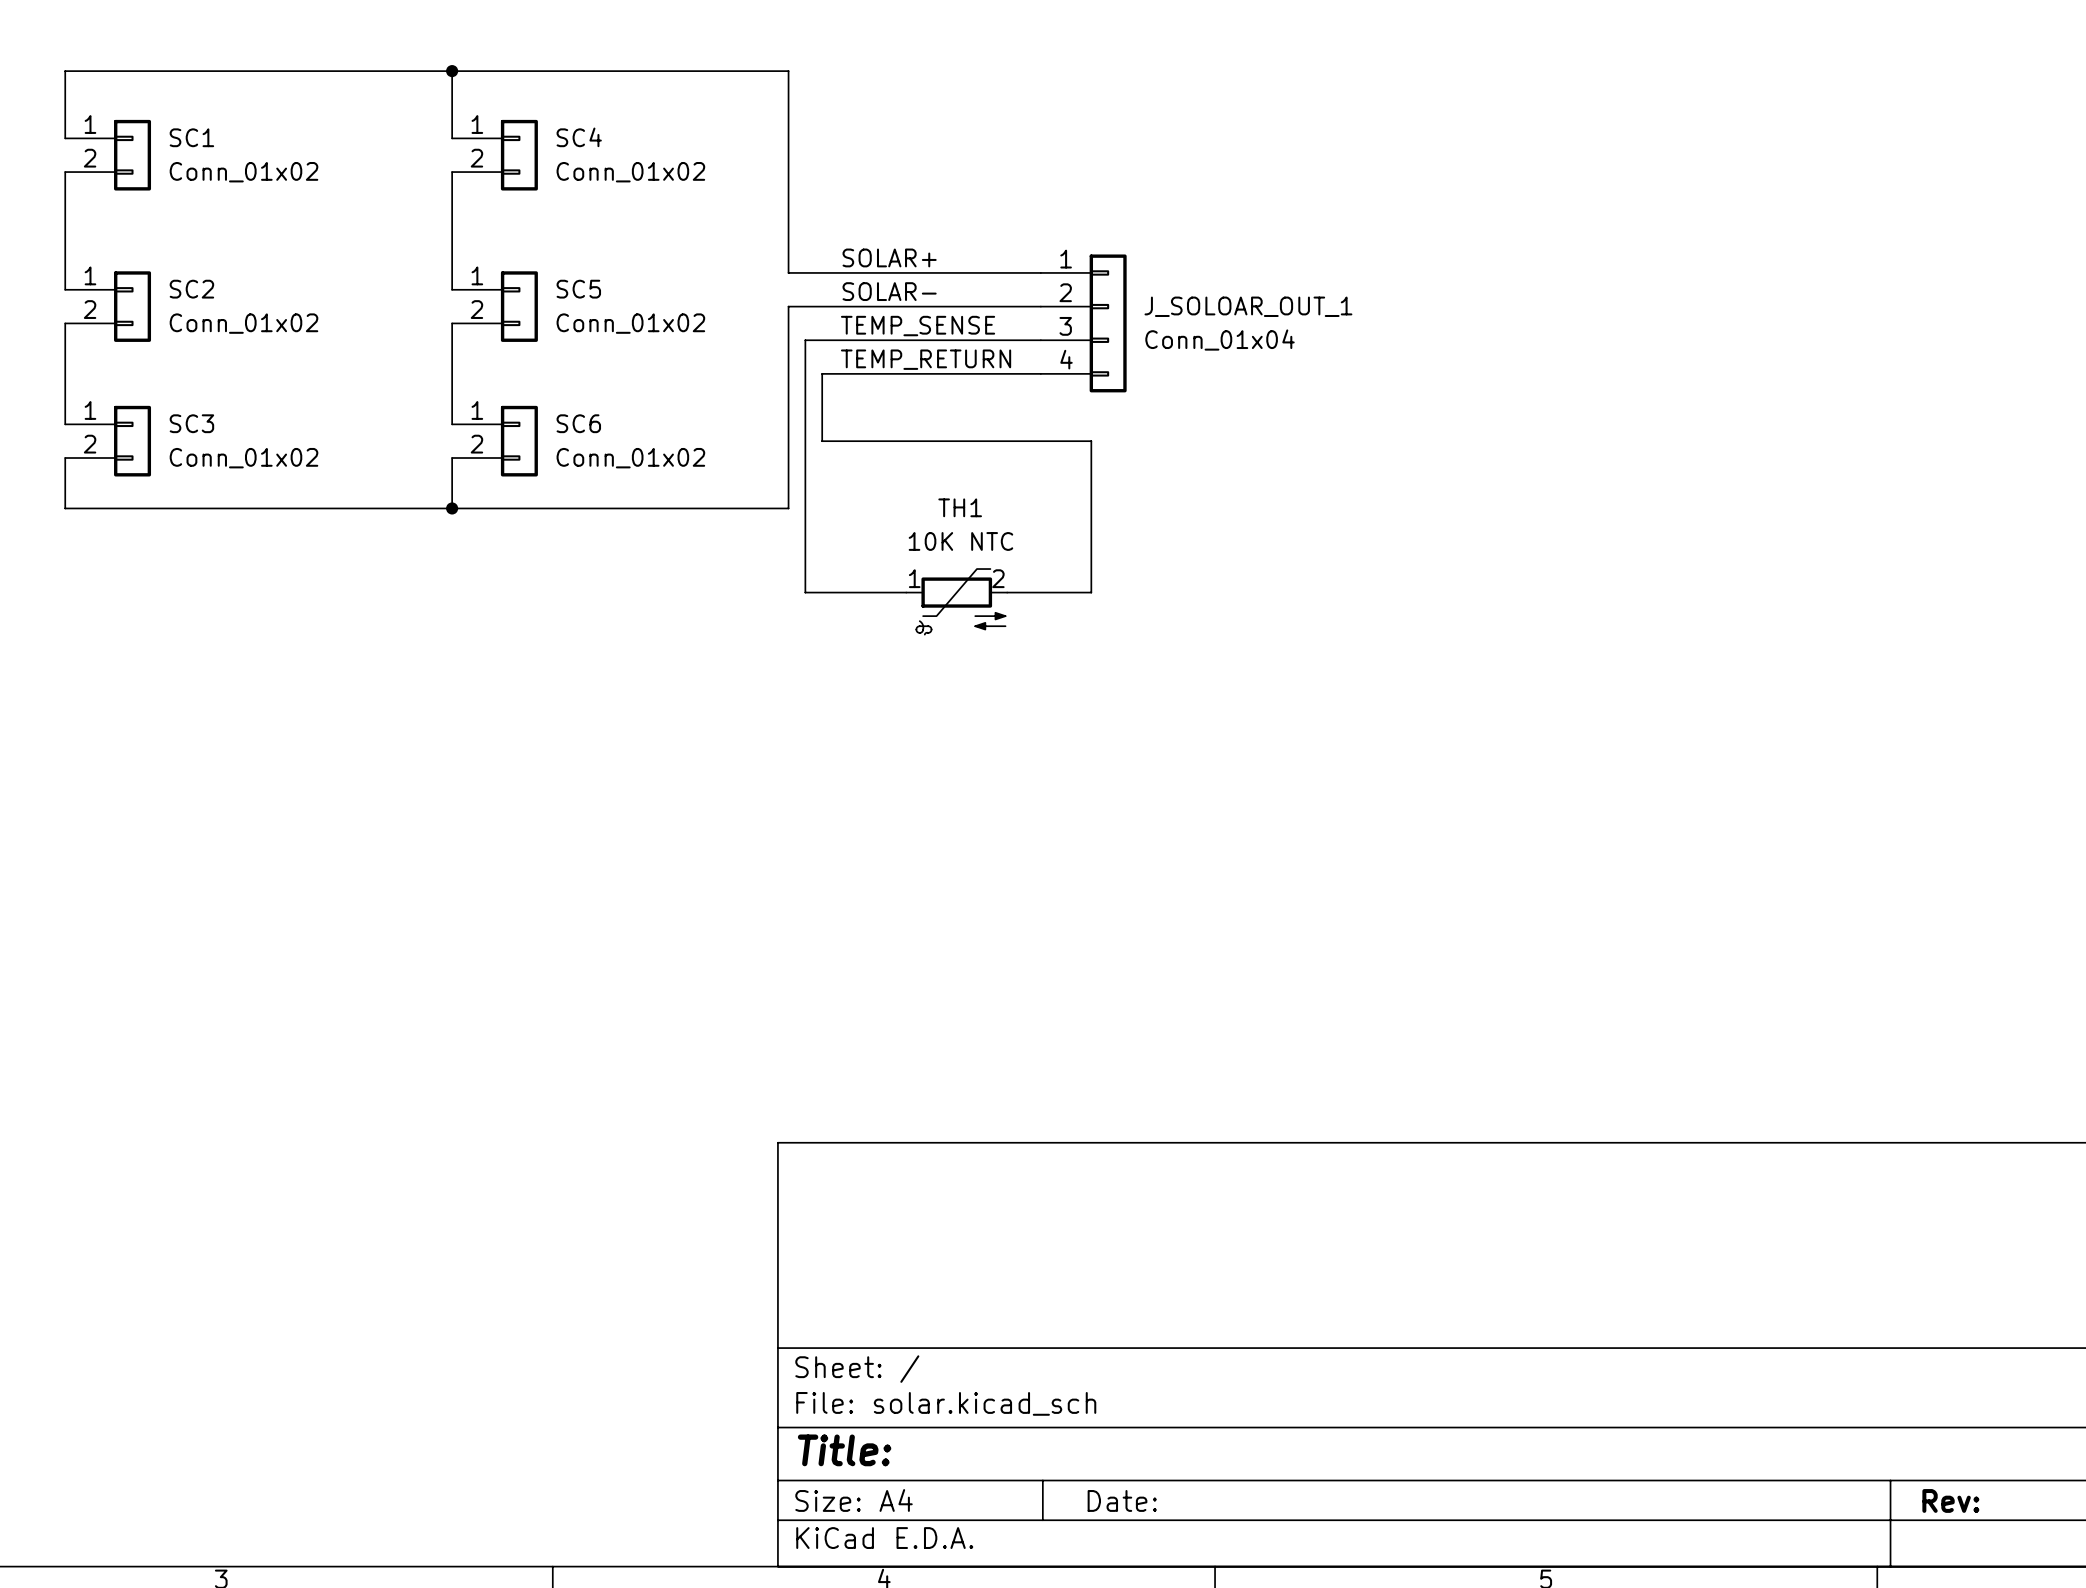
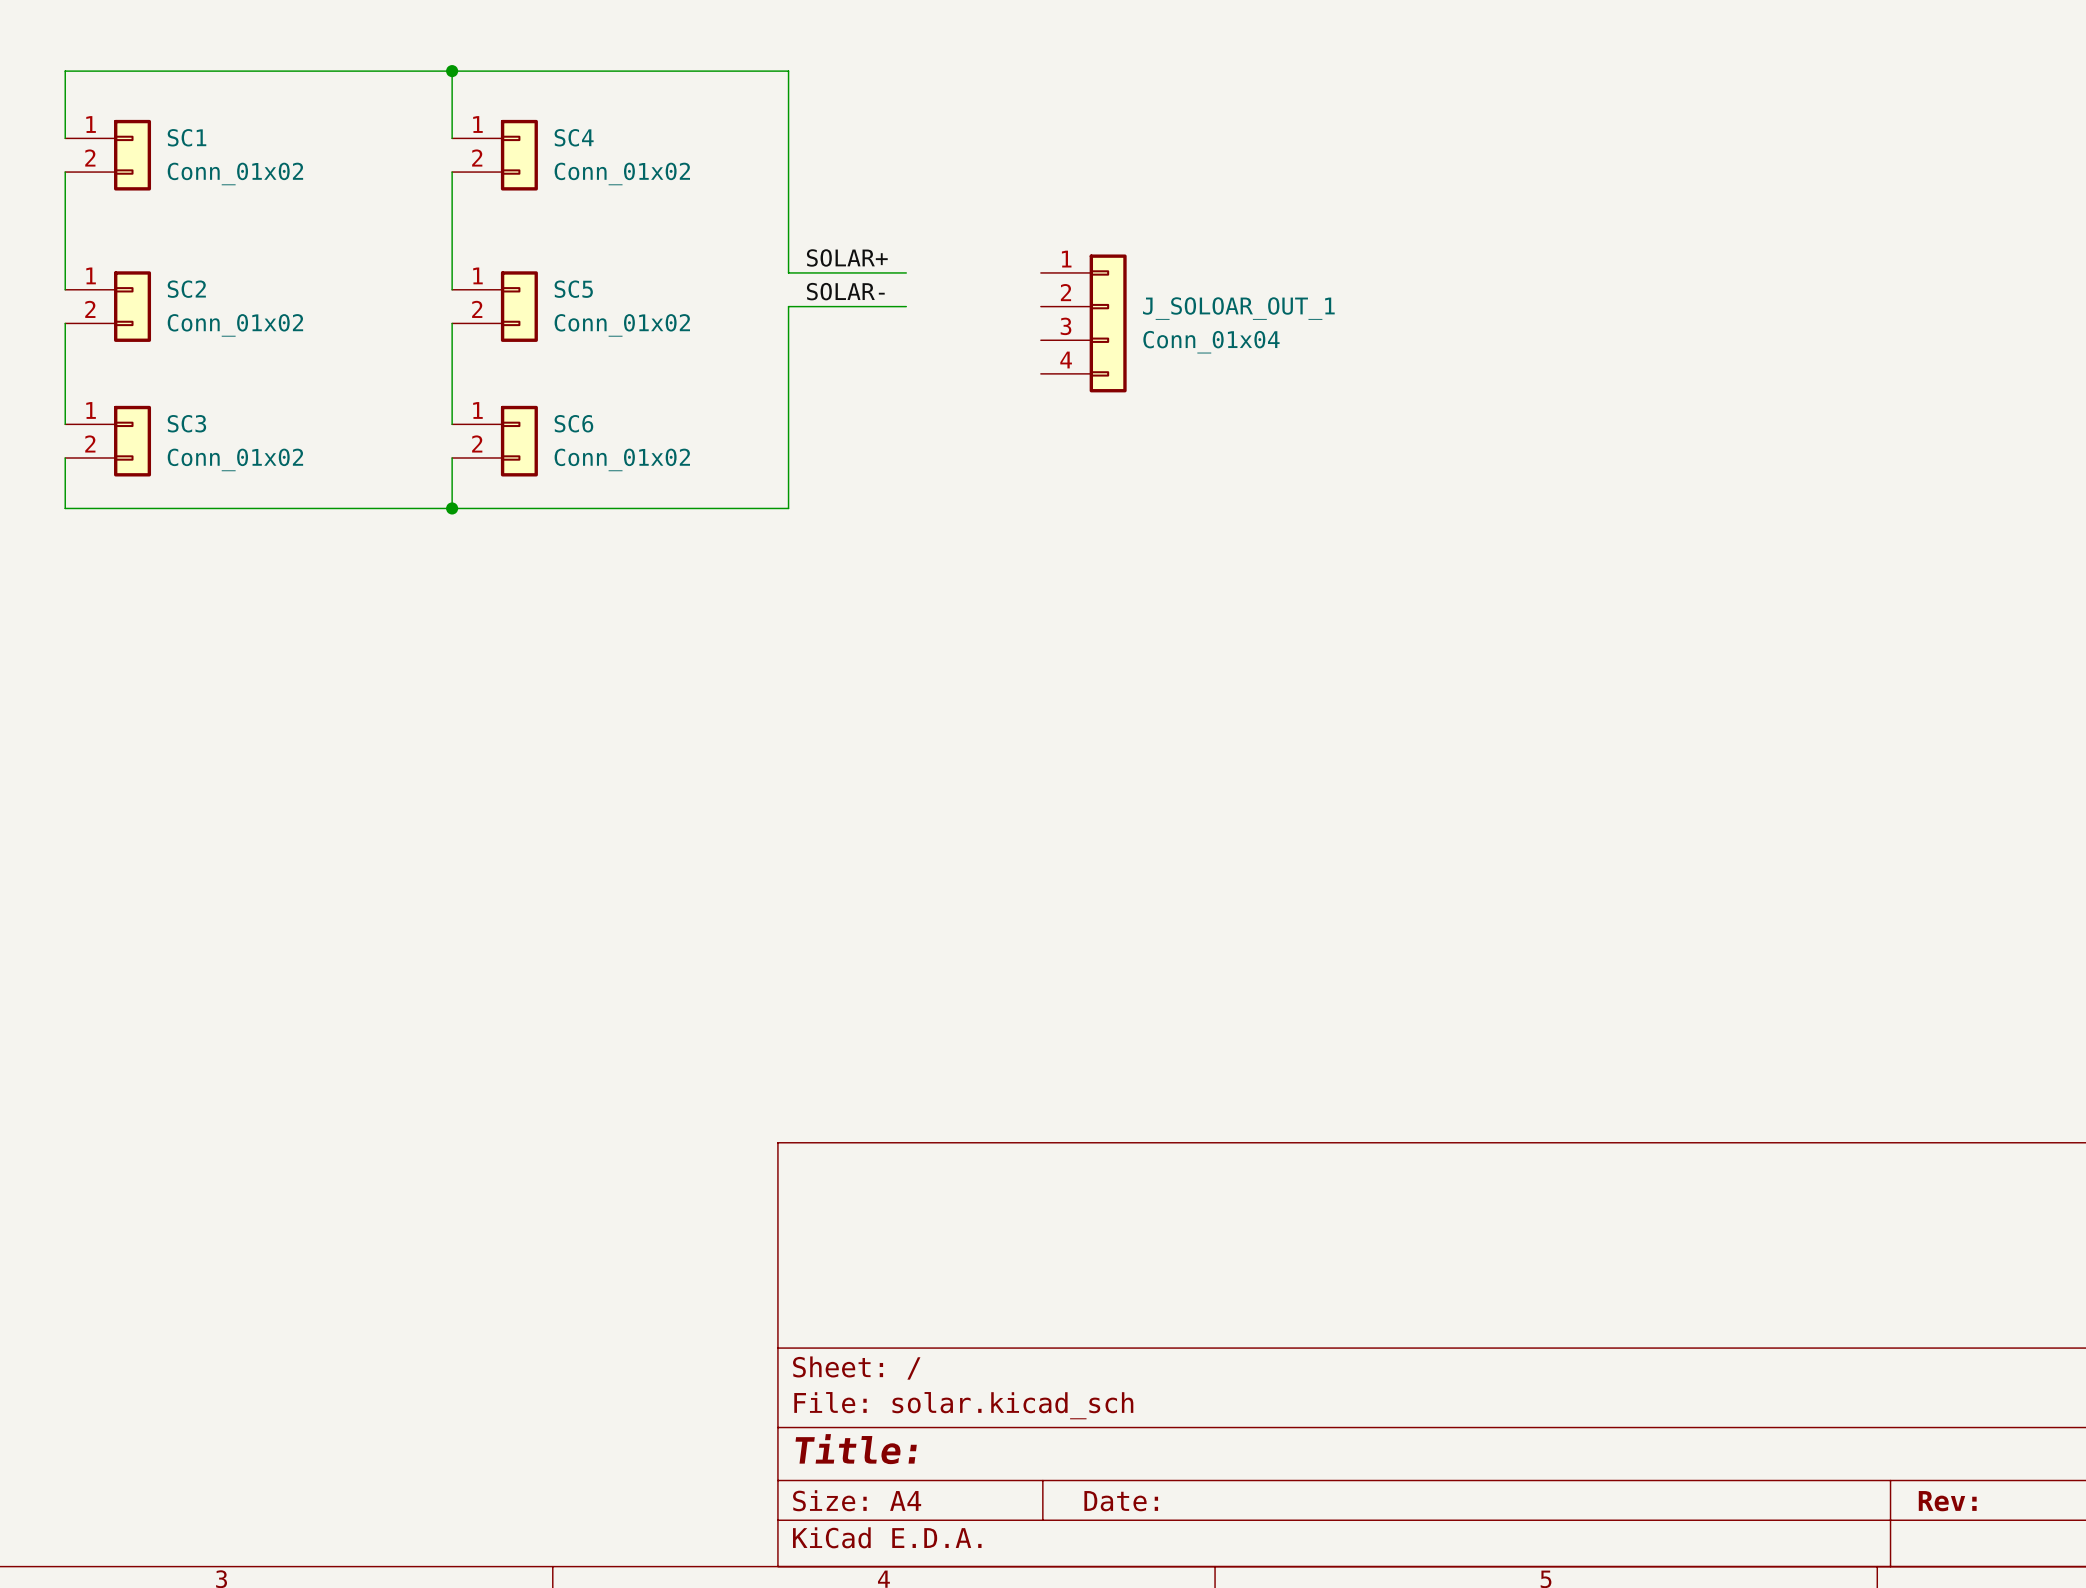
label position: SOLAR+ (889, 257) -> SOLAR+ (847, 257)
wire: (906, 272) (1040, 272) -> none
label position: SOLAR- (889, 291) -> SOLAR- (845, 291)
wire: (906, 306) (1040, 306) -> none
label: TEMP_SENSE (918, 326) -> none
wire: (1040, 340) (805, 340) (805, 592) (906, 592) -> none
label: TEMP_RETURN (926, 359) -> none
wire: (1040, 373) (822, 373) (822, 441) (1091, 441) (1091, 592) (1007, 592) -> none
TH1: 10K NTC (956, 601) -> none

